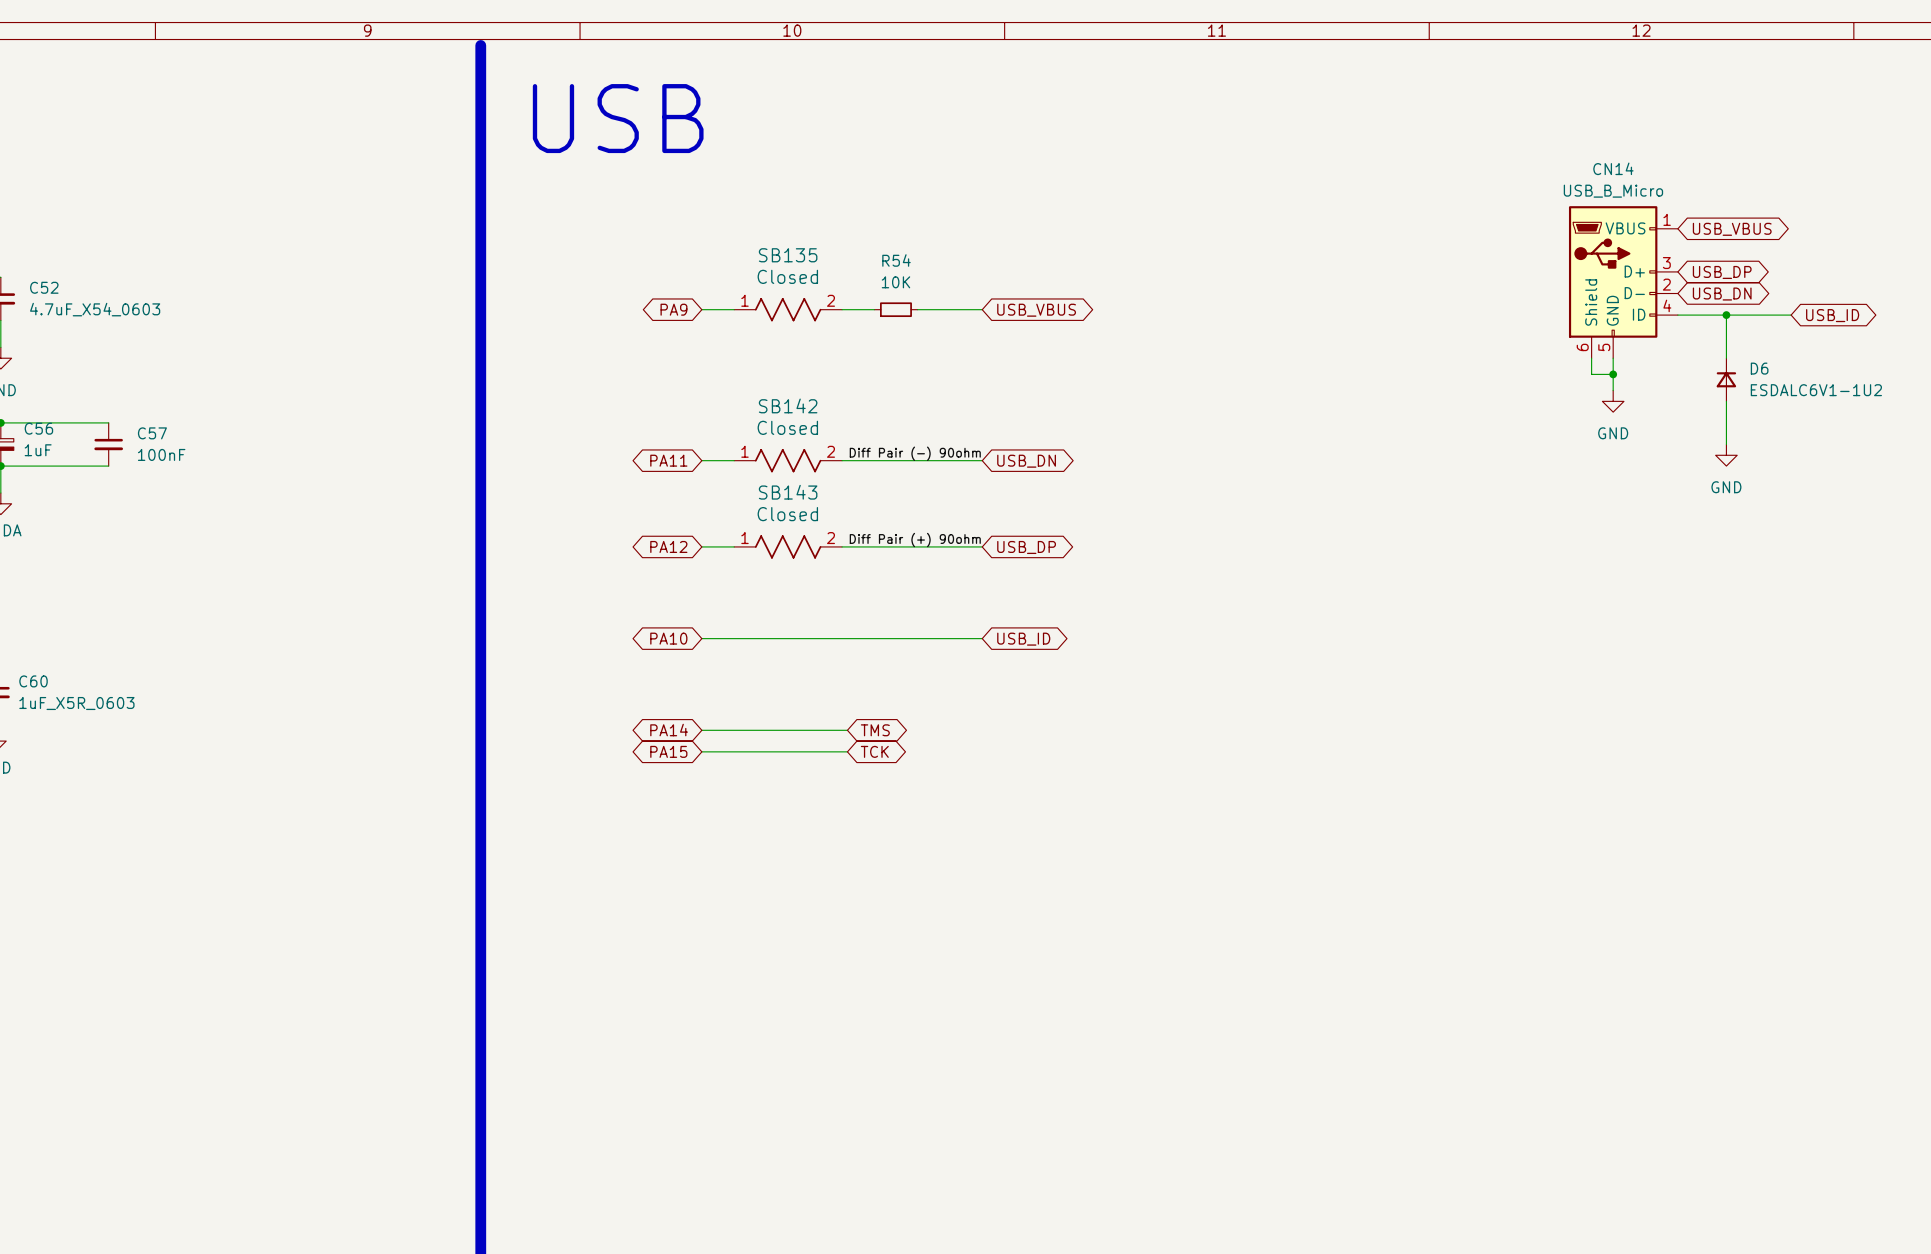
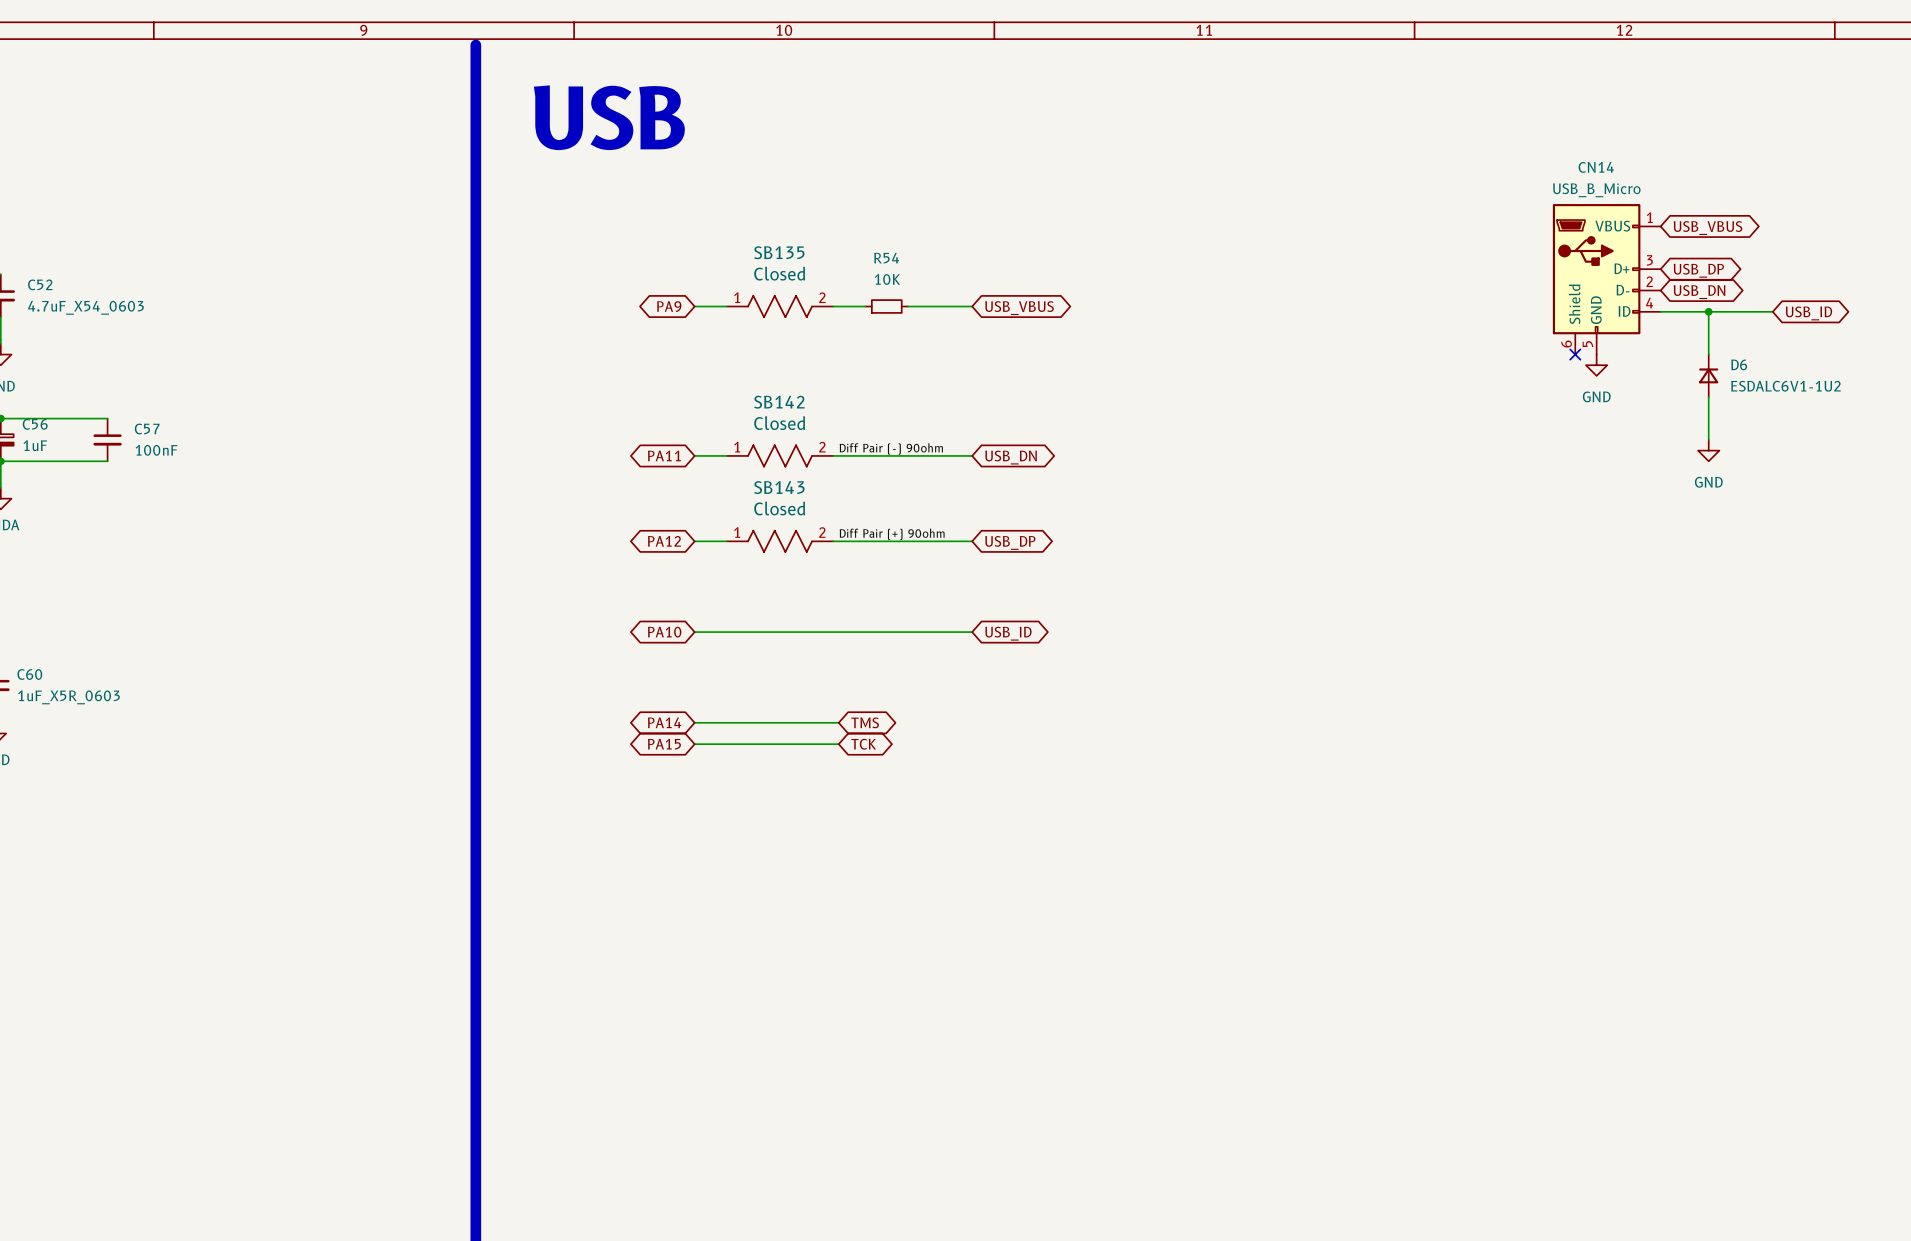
wire: (1591, 358) (1591, 374) (1613, 374) -> none
no-connect mark: none -> (1575, 354)
wire: (1613, 358) (1613, 390) -> none
junction: (1613, 374) -> none
power symbol position: GND (1613, 401) -> GND (1596, 365)

